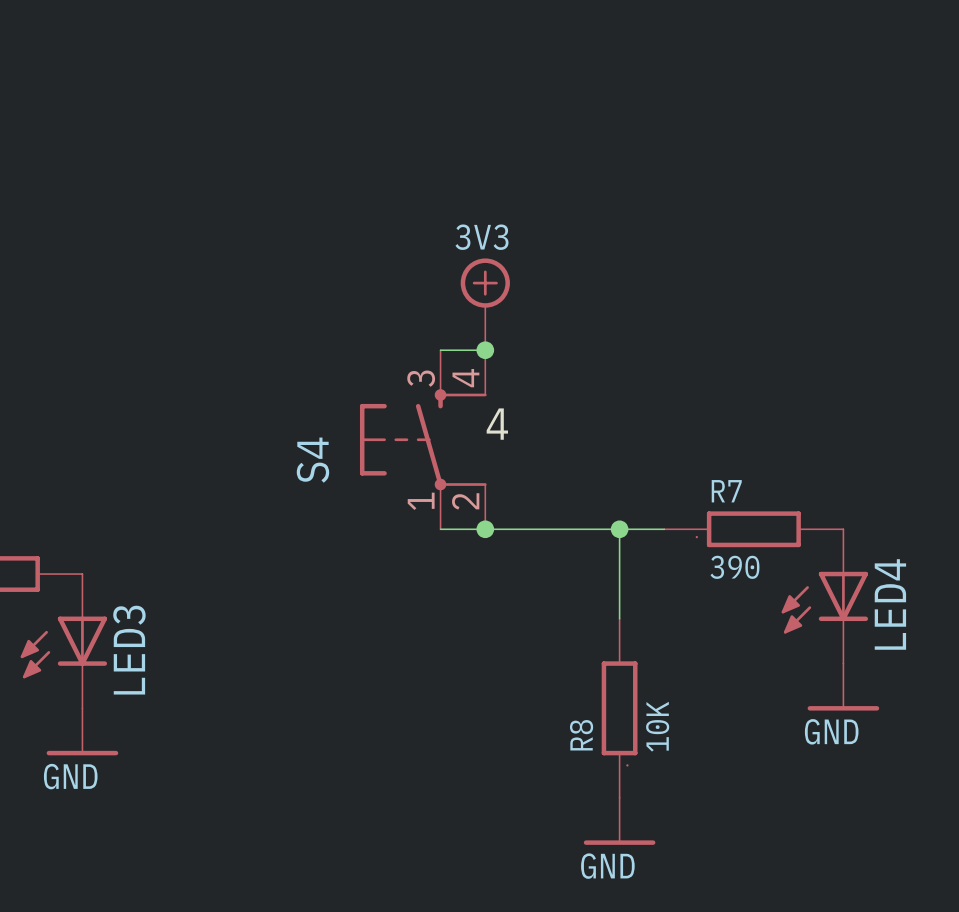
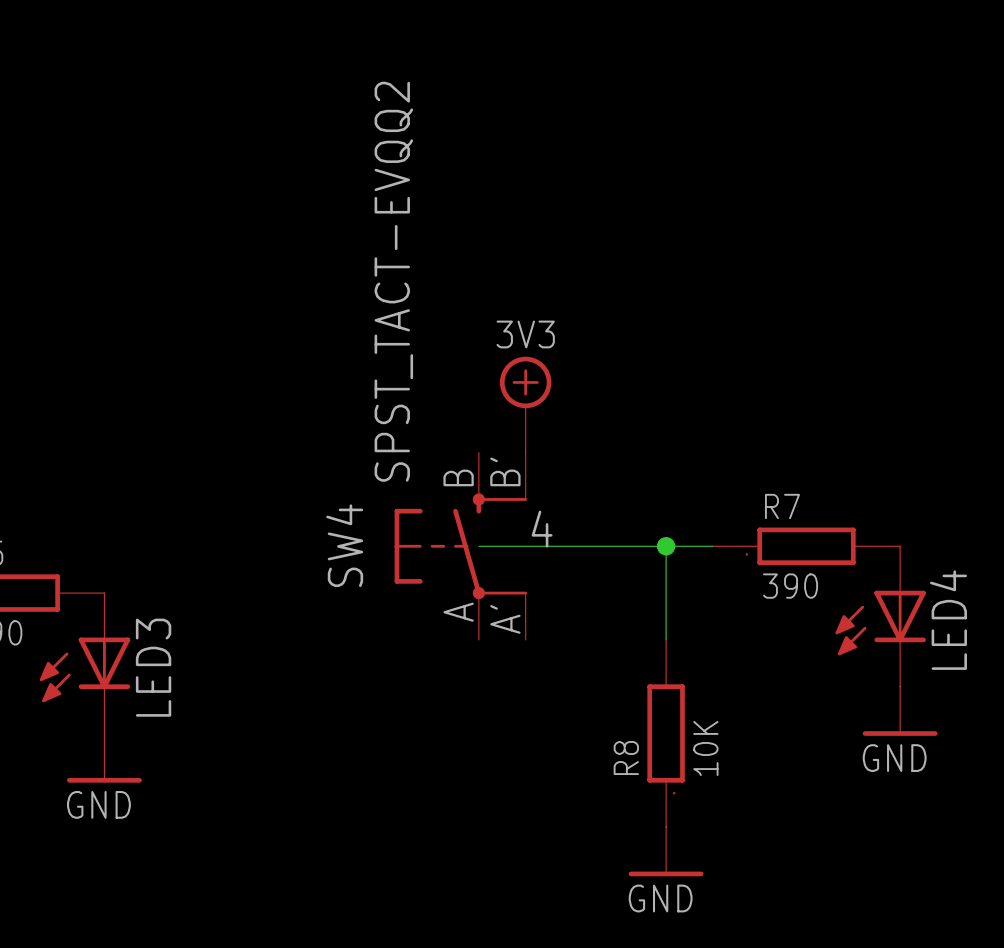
power symbol position: 3V3 (485, 304) -> 3V3 (525, 404)
wire: (440, 350) (485, 350) -> none
junction: (485, 350) -> none
label position: 4 (497, 424) -> 4 (542, 529)
S4: (423, 439) -> none
SW4: none -> SPST_TACT-EVQQ2 (460, 546)
junction: (485, 529) -> none

